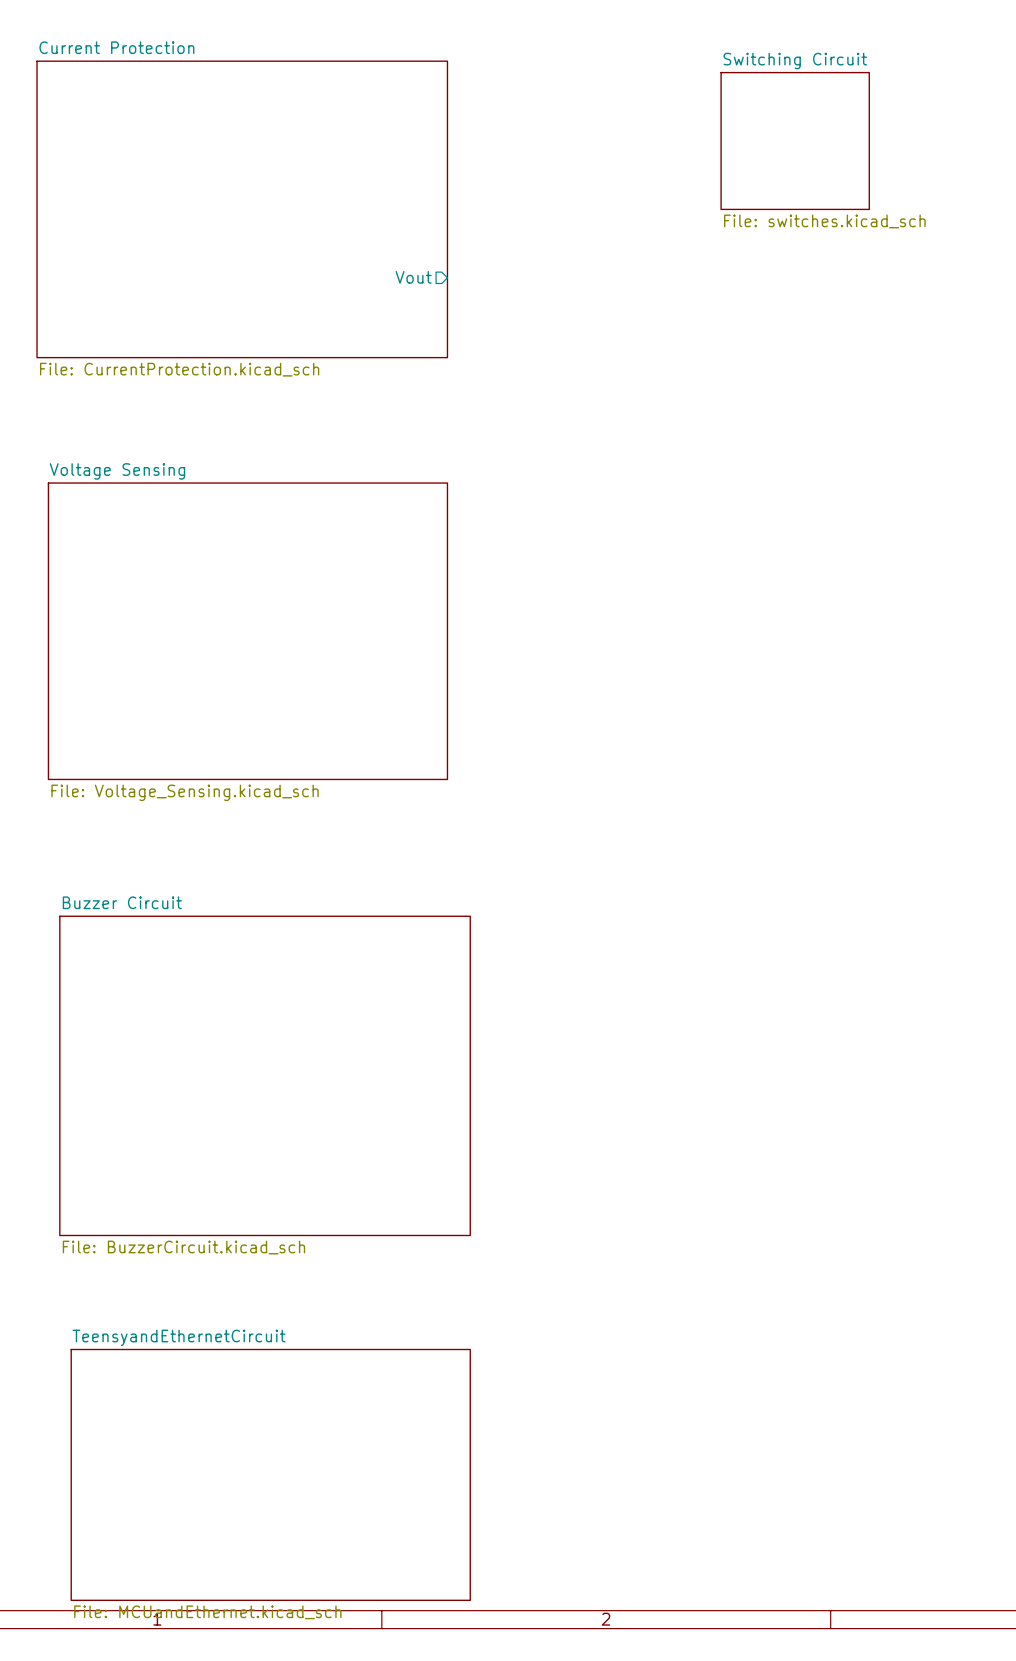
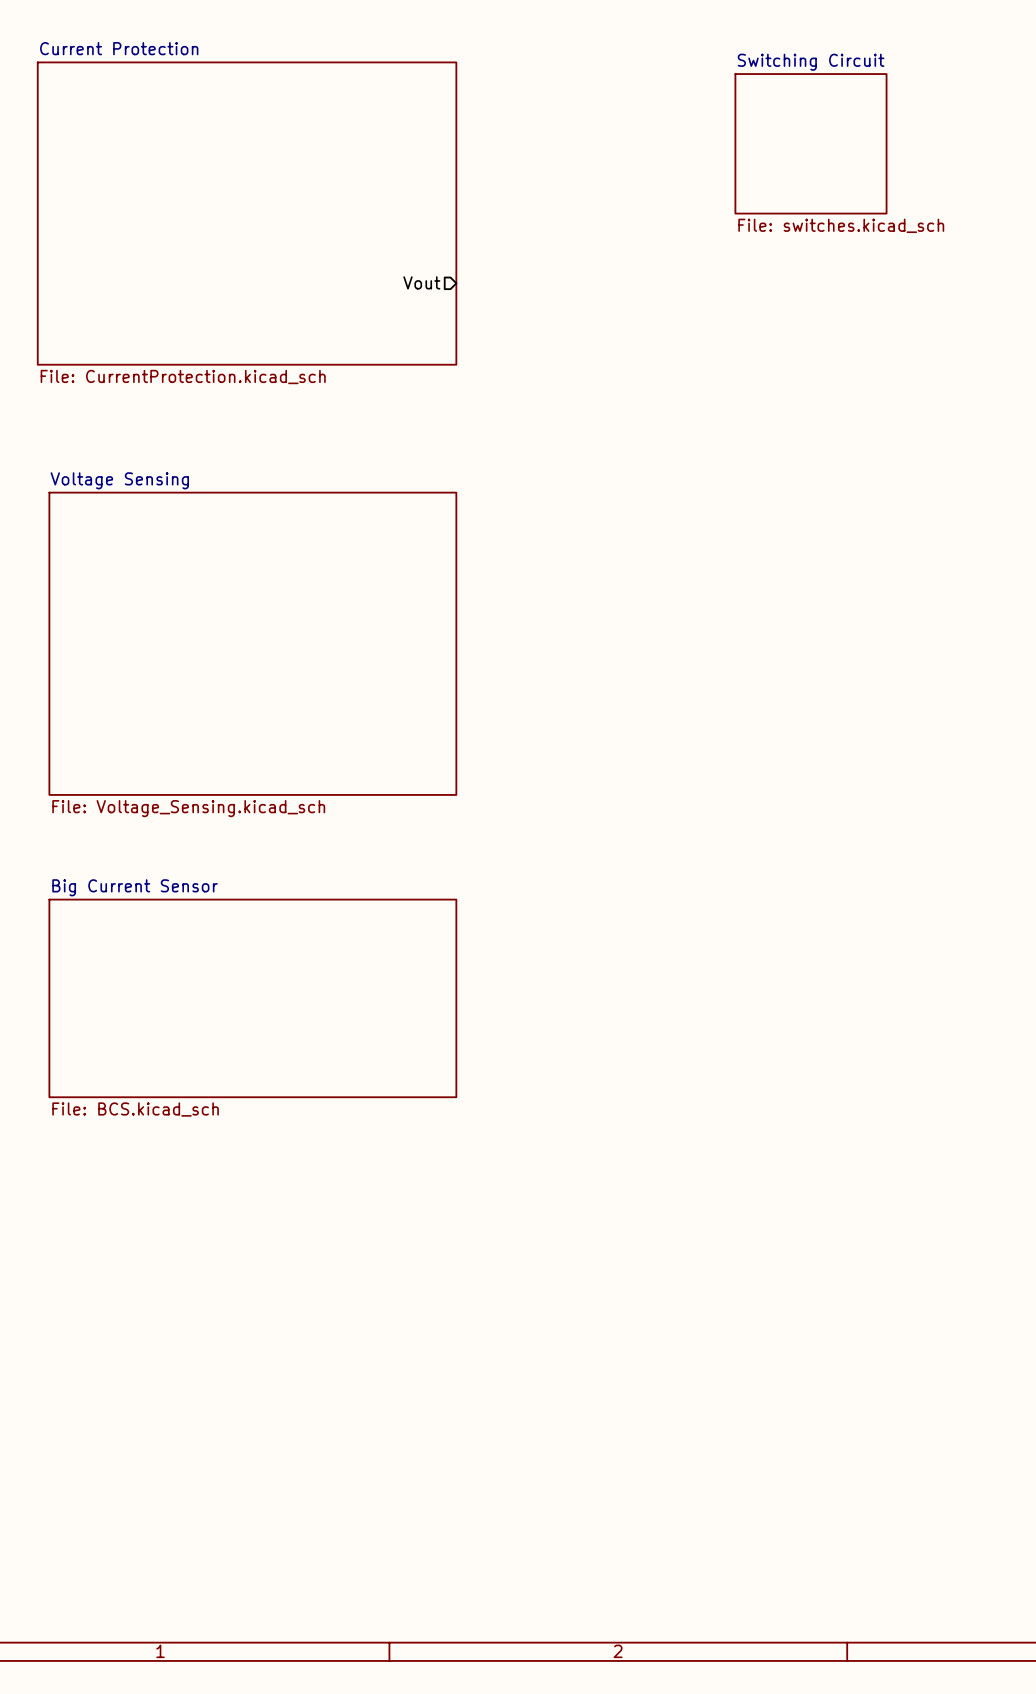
sheet Big Current Sensor: none -> File: BCS.kicad_sch (252, 998)
sheet Buzzer Circuit: File: BuzzerCircuit.kicad_sch (265, 1075) -> none
sheet TeensyandEthernetCircuit: File: MCUandEthernet.kicad_sch (270, 1474) -> none

